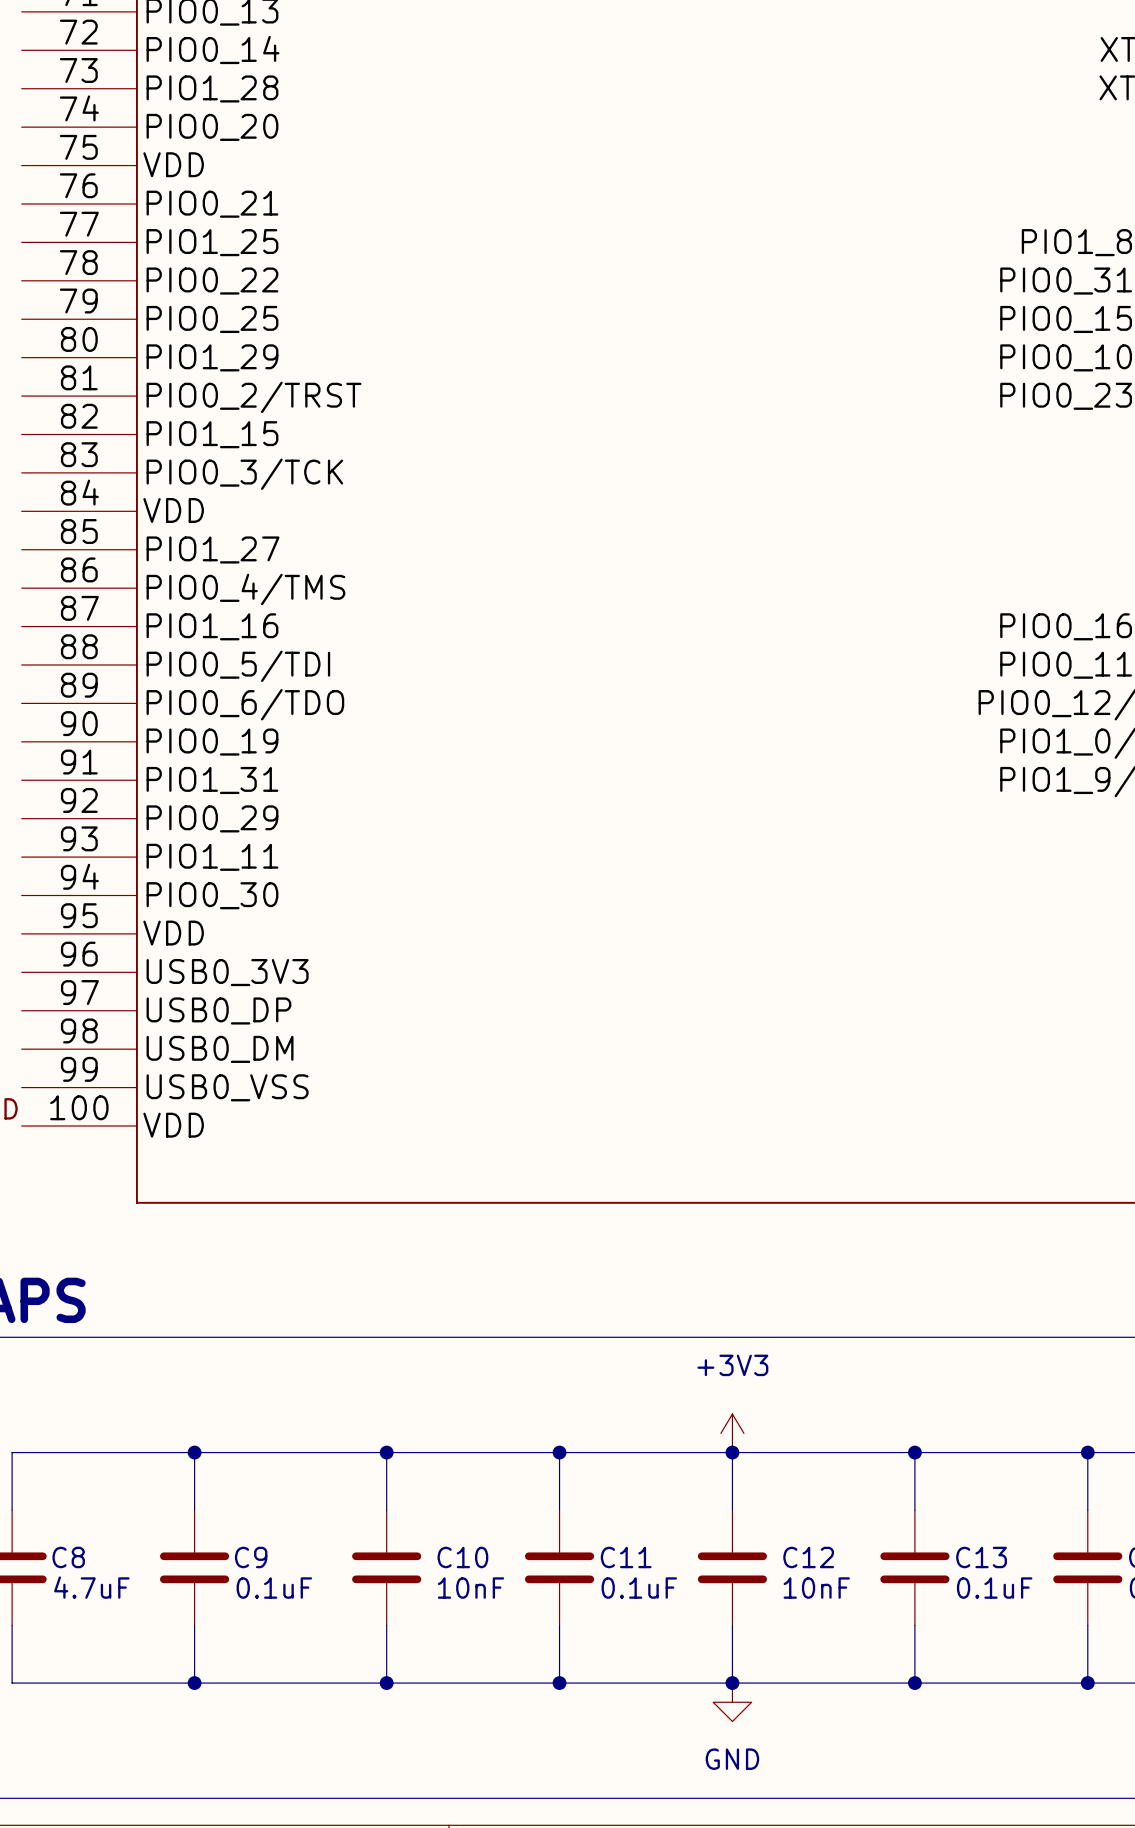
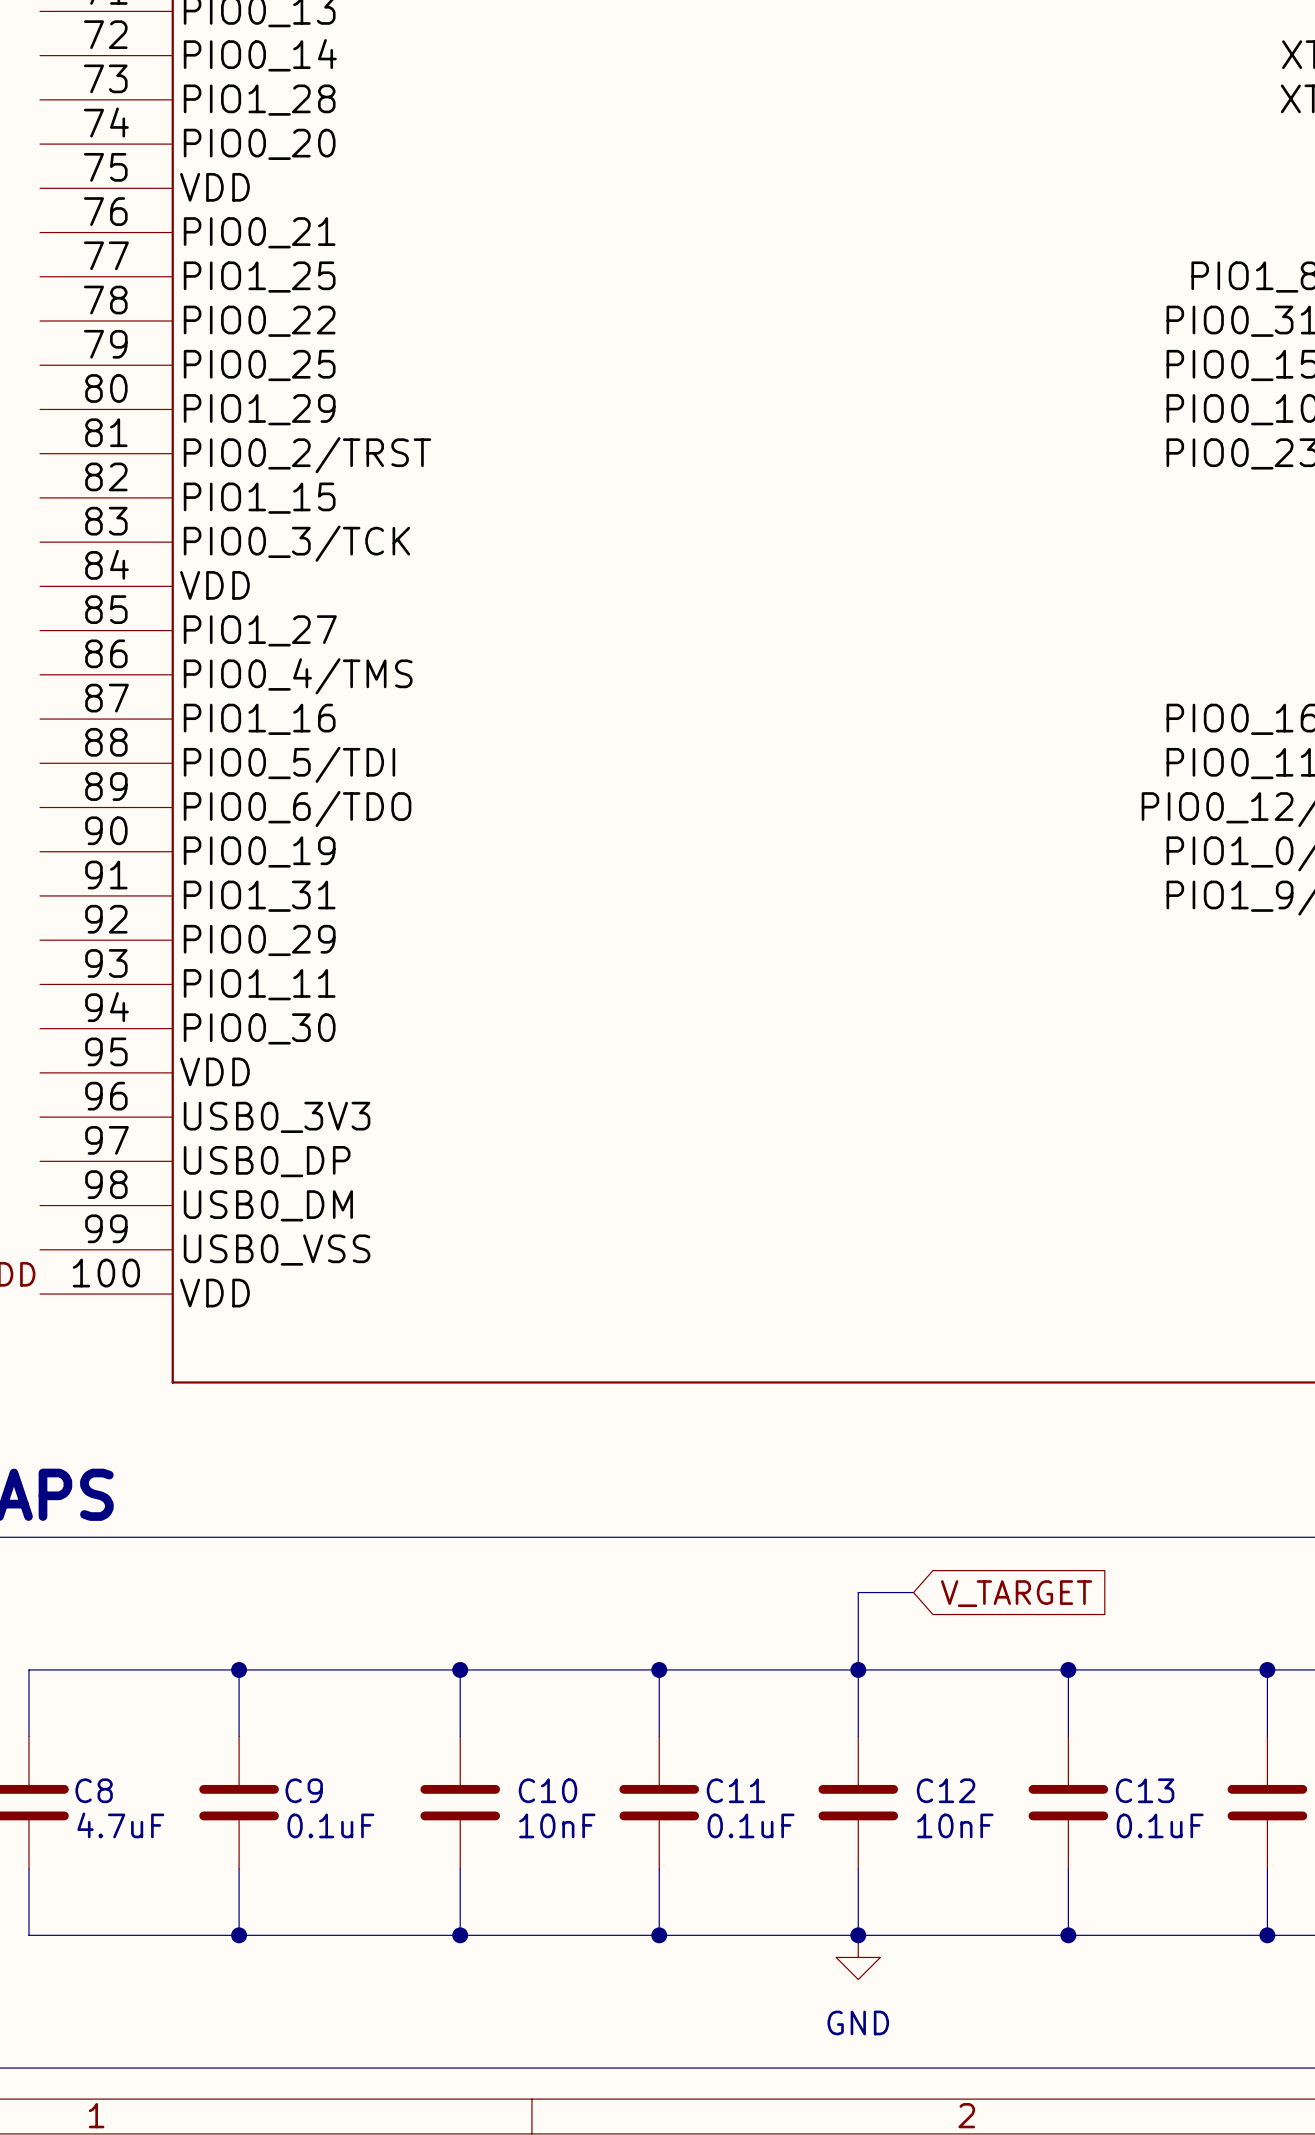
wire: none -> (913, 1592) (858, 1592) (858, 1669)
global label: none -> V_TARGET (1016, 1593)
power symbol: +3V3 (732, 1433) -> none

